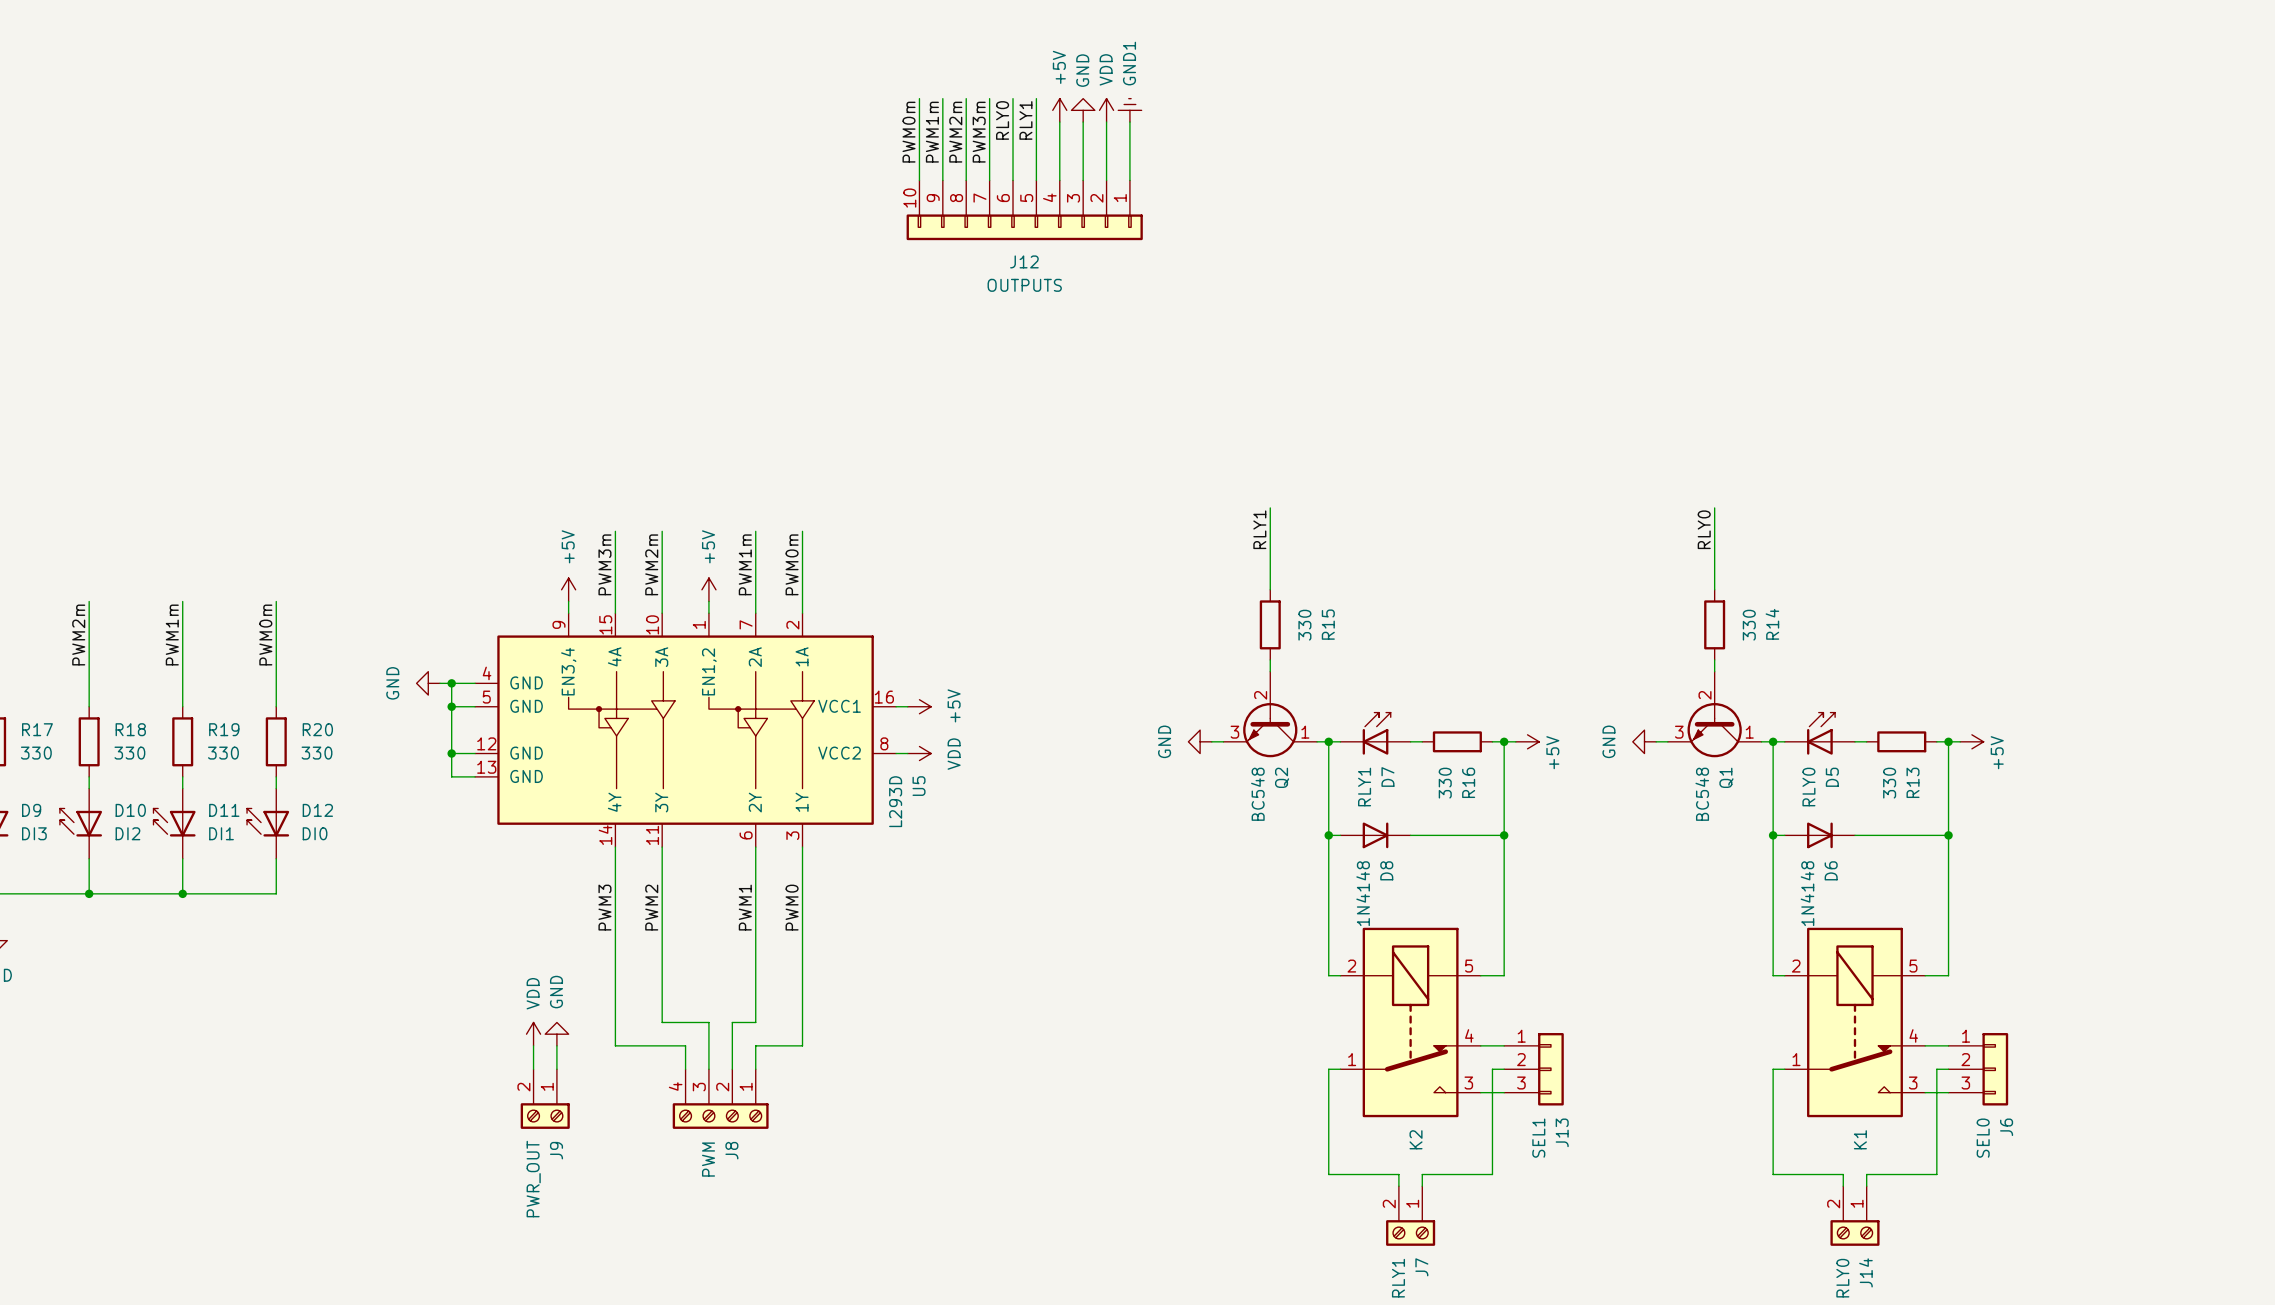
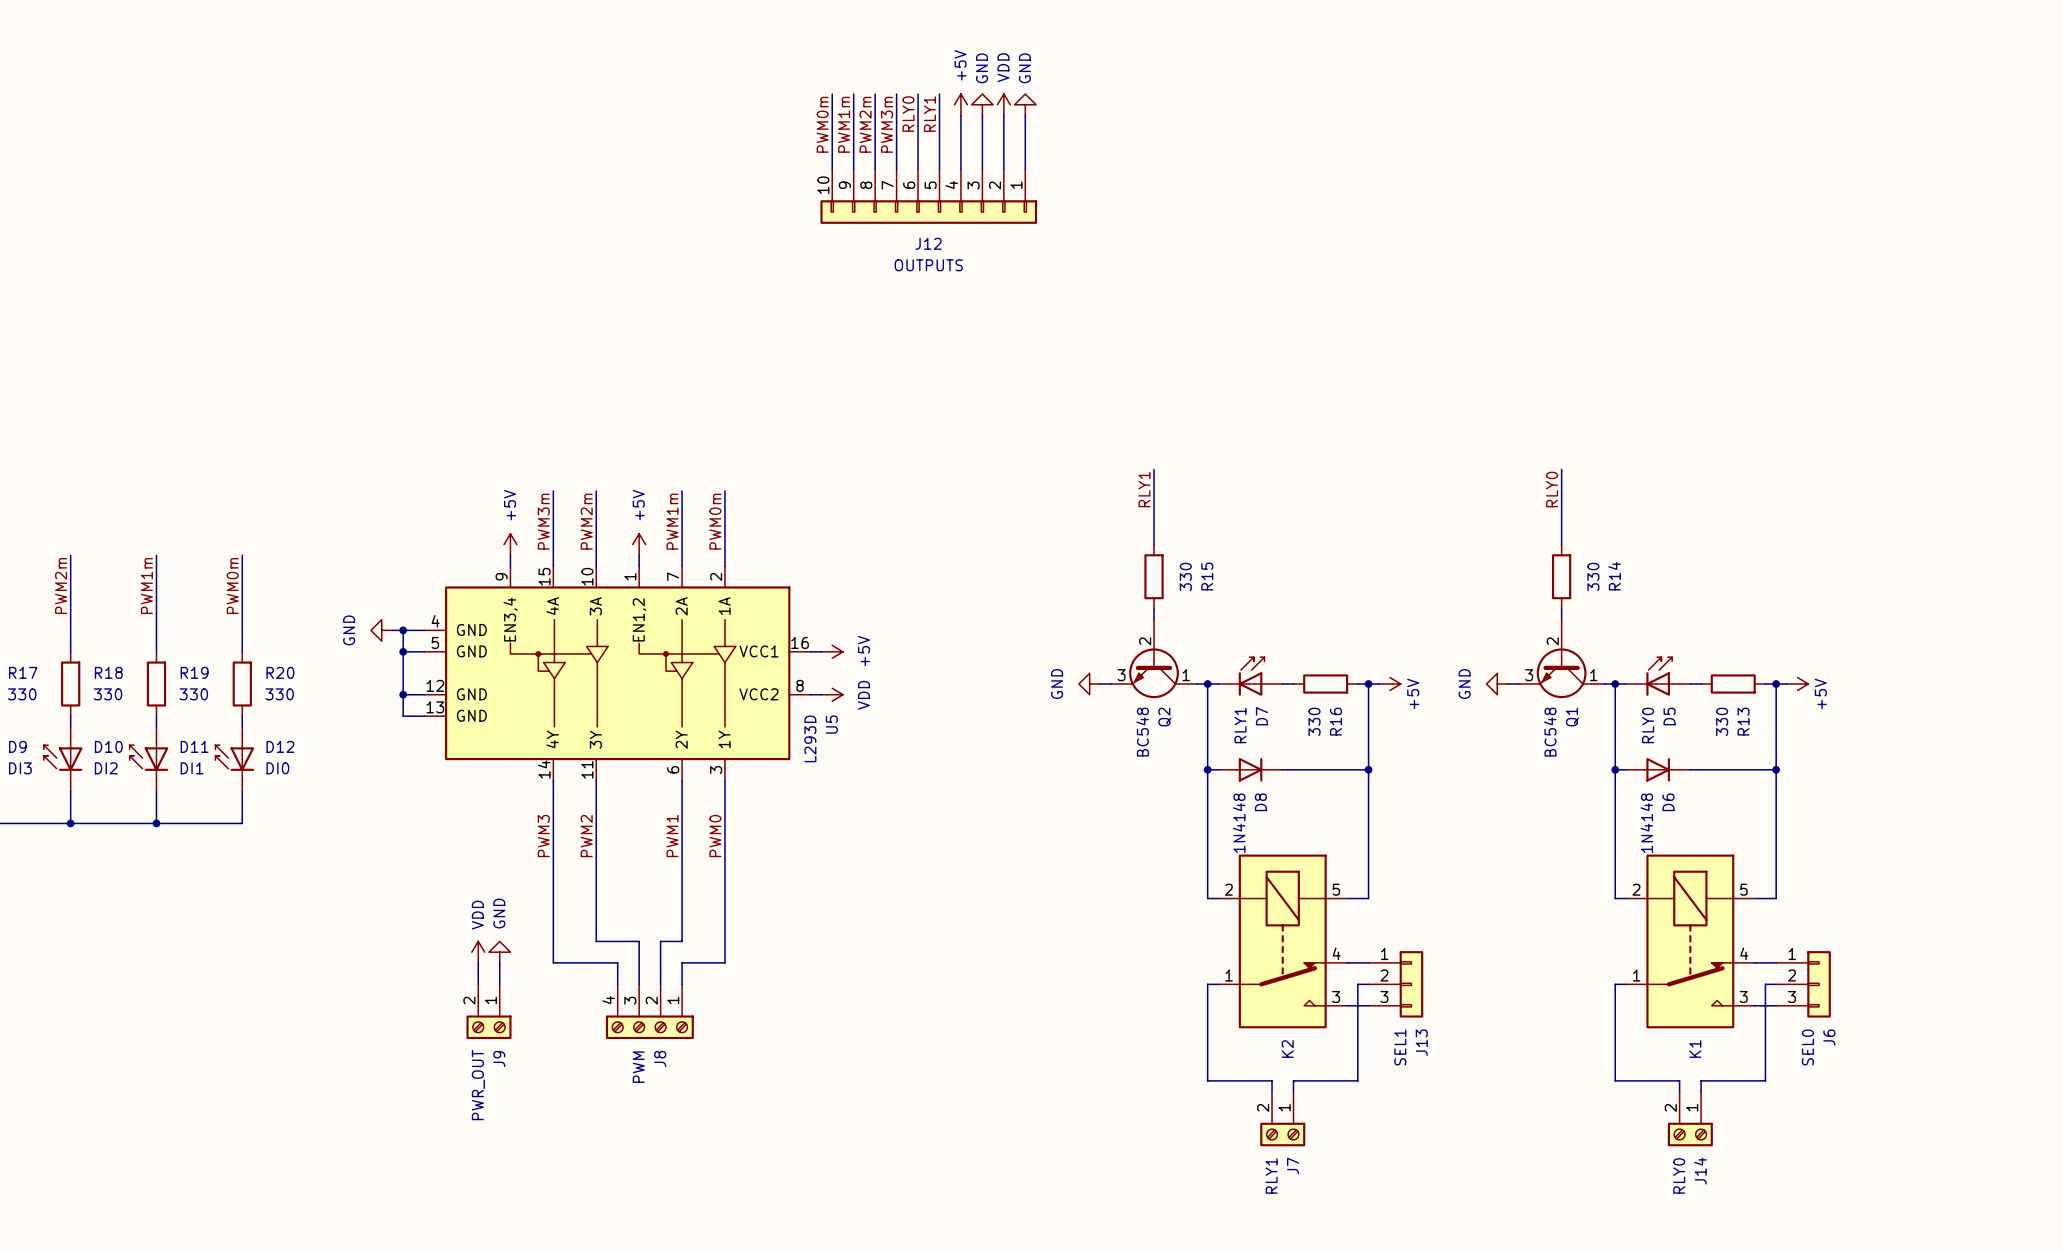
power symbol: GND1 (1129, 110) -> GND (1025, 104)

